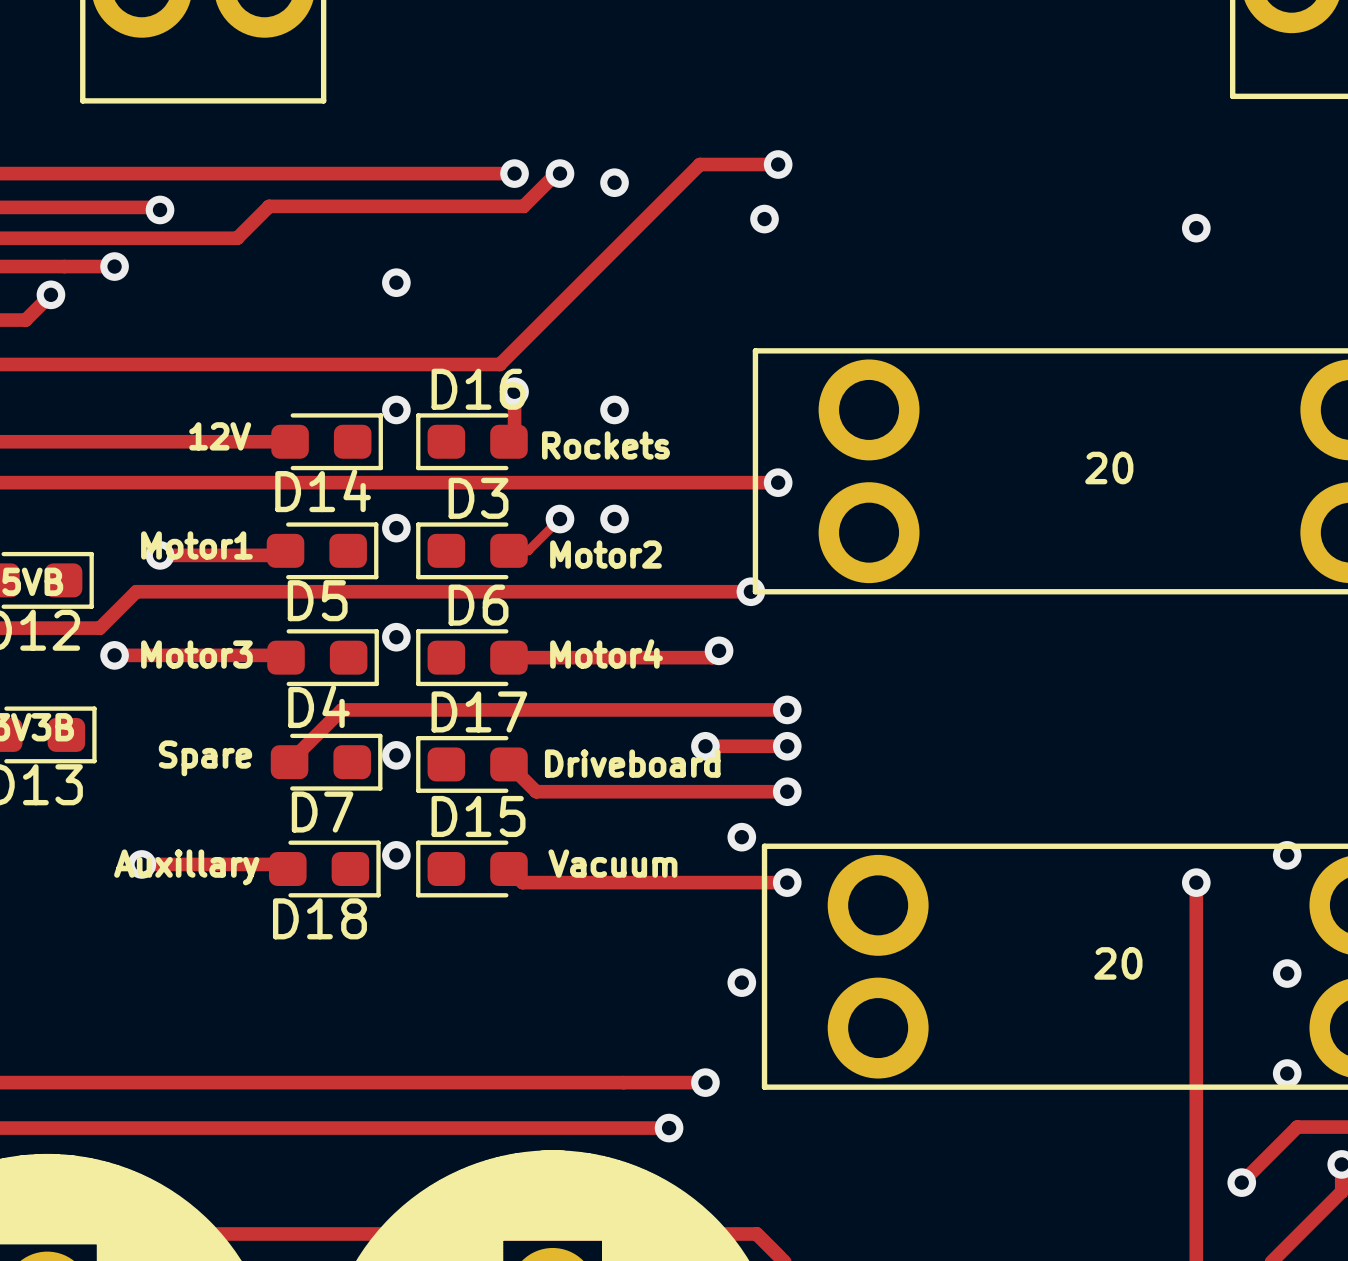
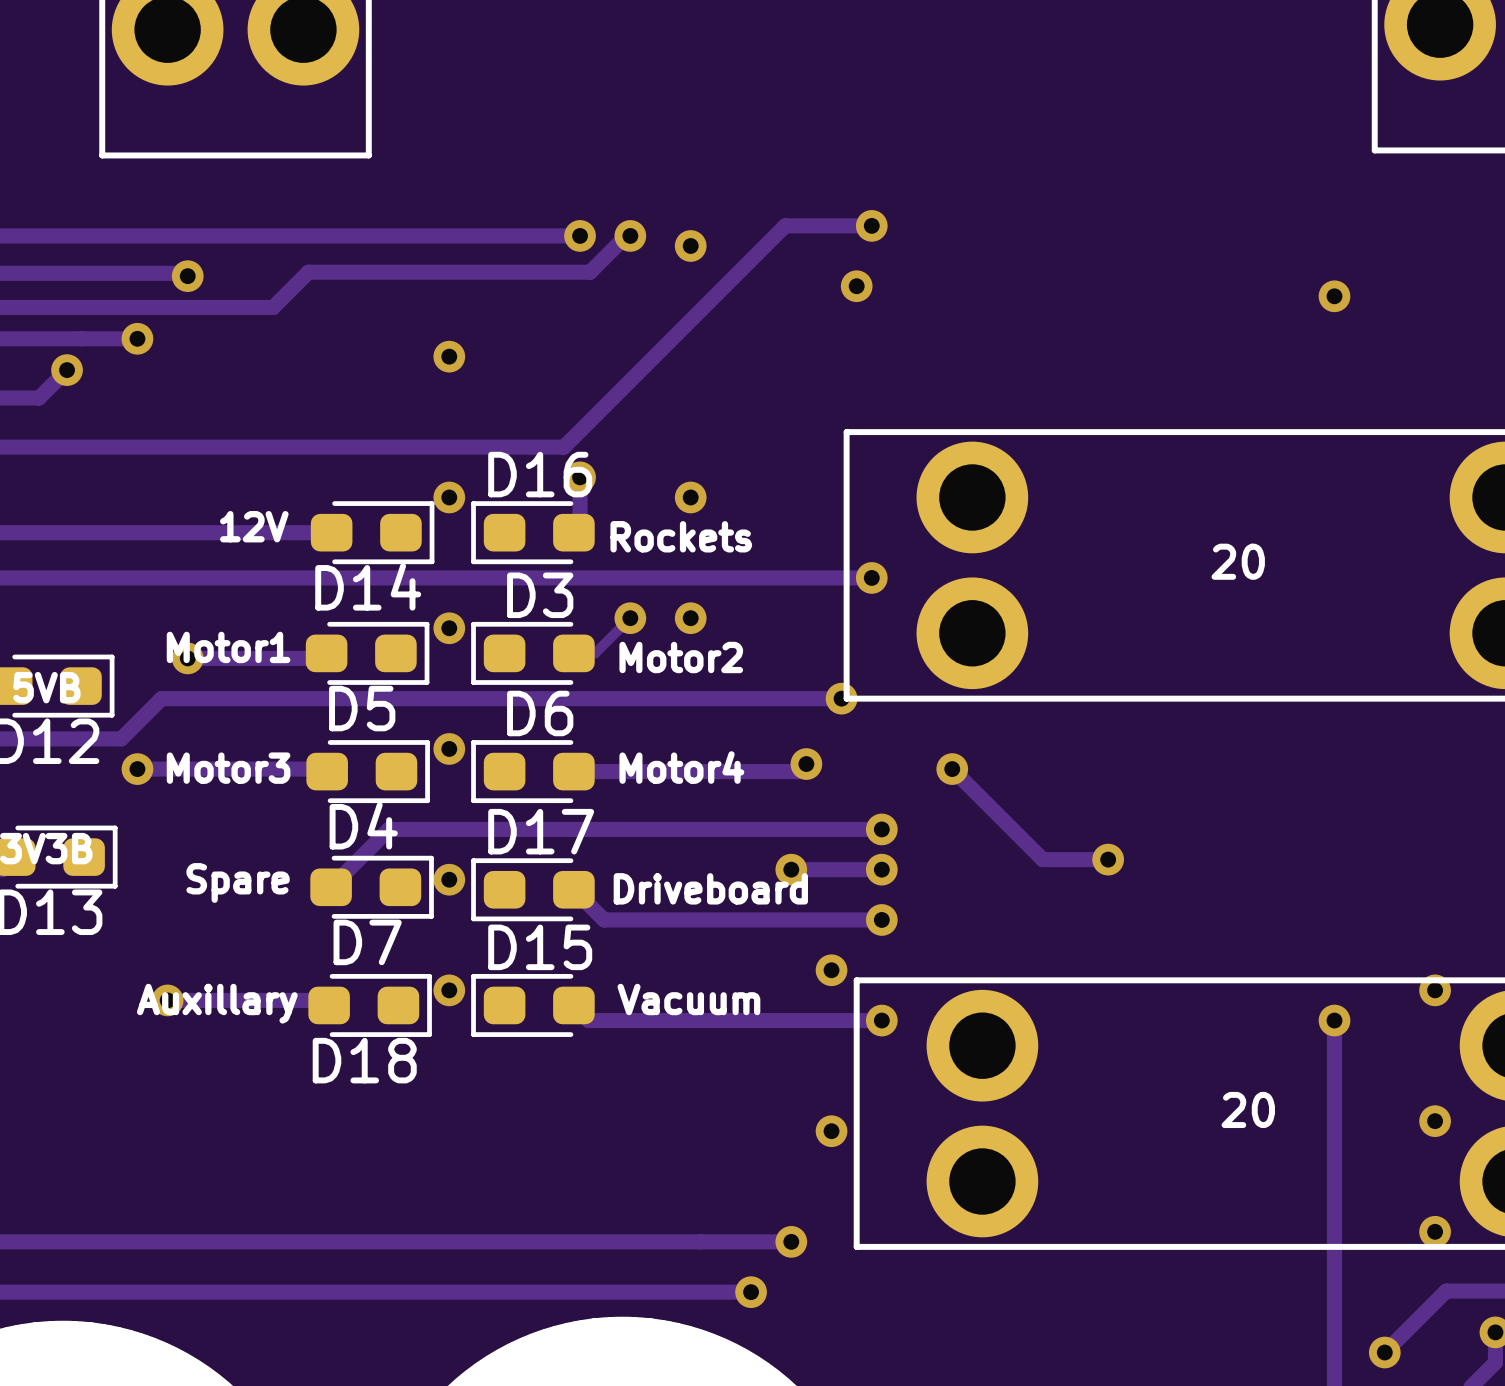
track: none -> (952, 769) (1042, 859) (1108, 859)
via: none -> (952, 769)
via: none -> (1108, 859)

